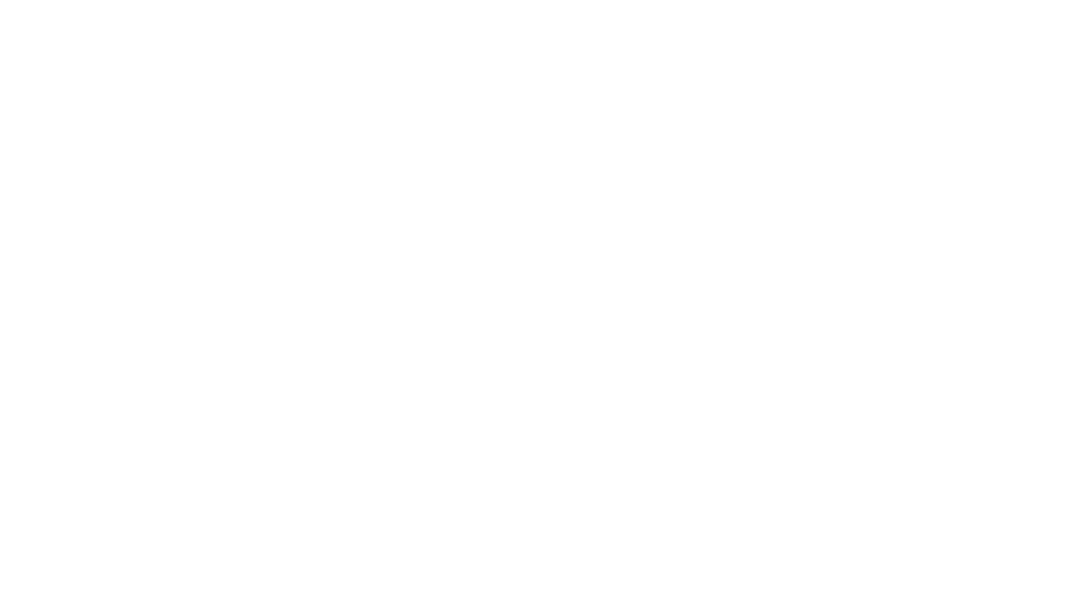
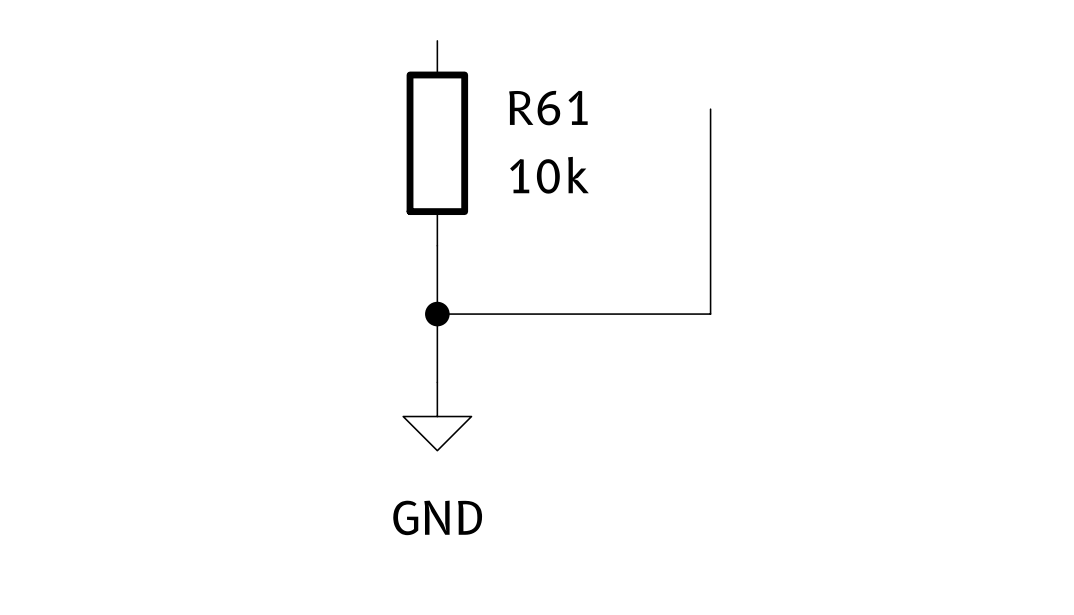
wire: none -> (710, 109) (710, 314) (437, 314)
R61: none -> 10k (437, 143)
wire: none -> (437, 245) (437, 382)
junction: none -> (437, 314)
power symbol: none -> GND (437, 416)

